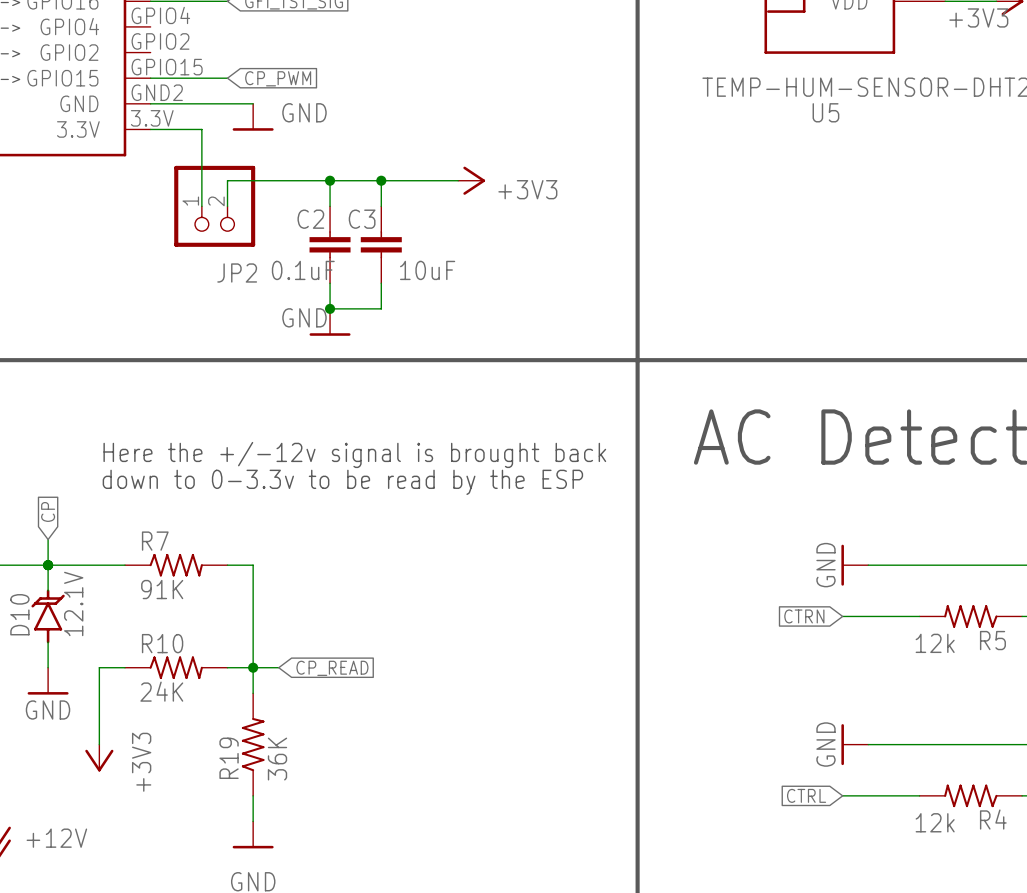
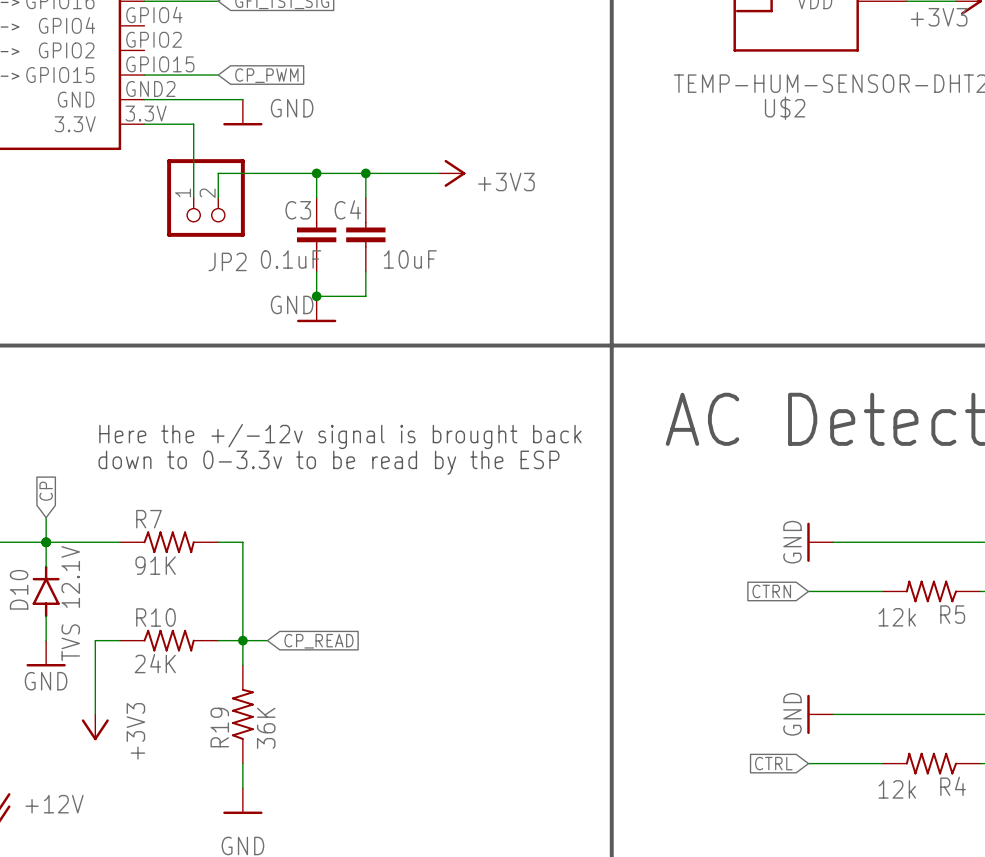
U5 name: U5 (825, 112) -> U$2 (785, 108)
C2 name: C2 (310, 219) -> C3 (298, 210)
C3 name: C3 (362, 219) -> C4 (347, 209)
D10 symbol: [31, 589, 65, 644] -> [32, 565, 60, 618]
D10 value: 12.1V (73, 603) -> TVS 12.1V (70, 603)

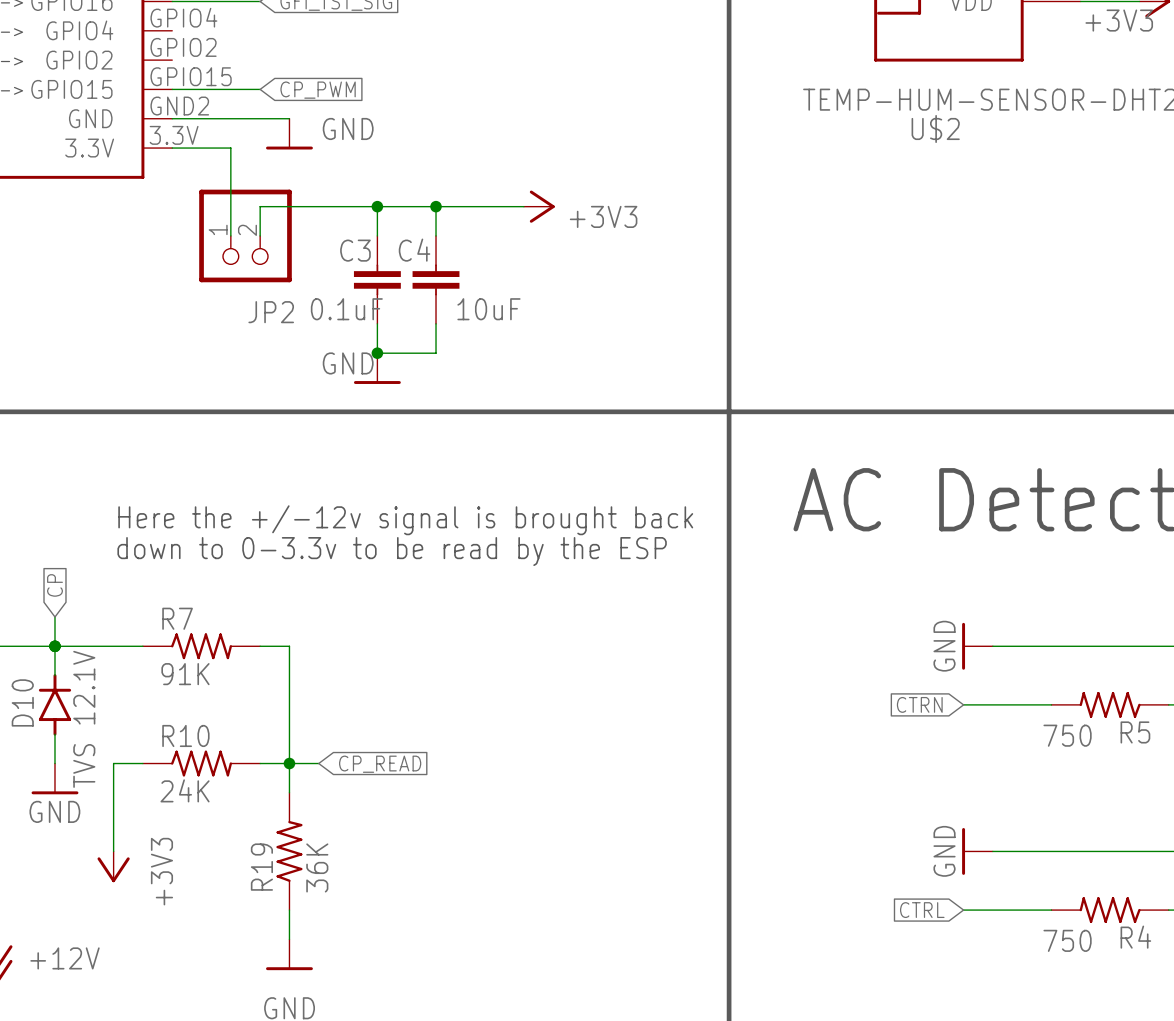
R5 value: 12k (897, 617) -> 750 (1067, 735)
R4 value: 12k (897, 789) -> 750 (1067, 940)

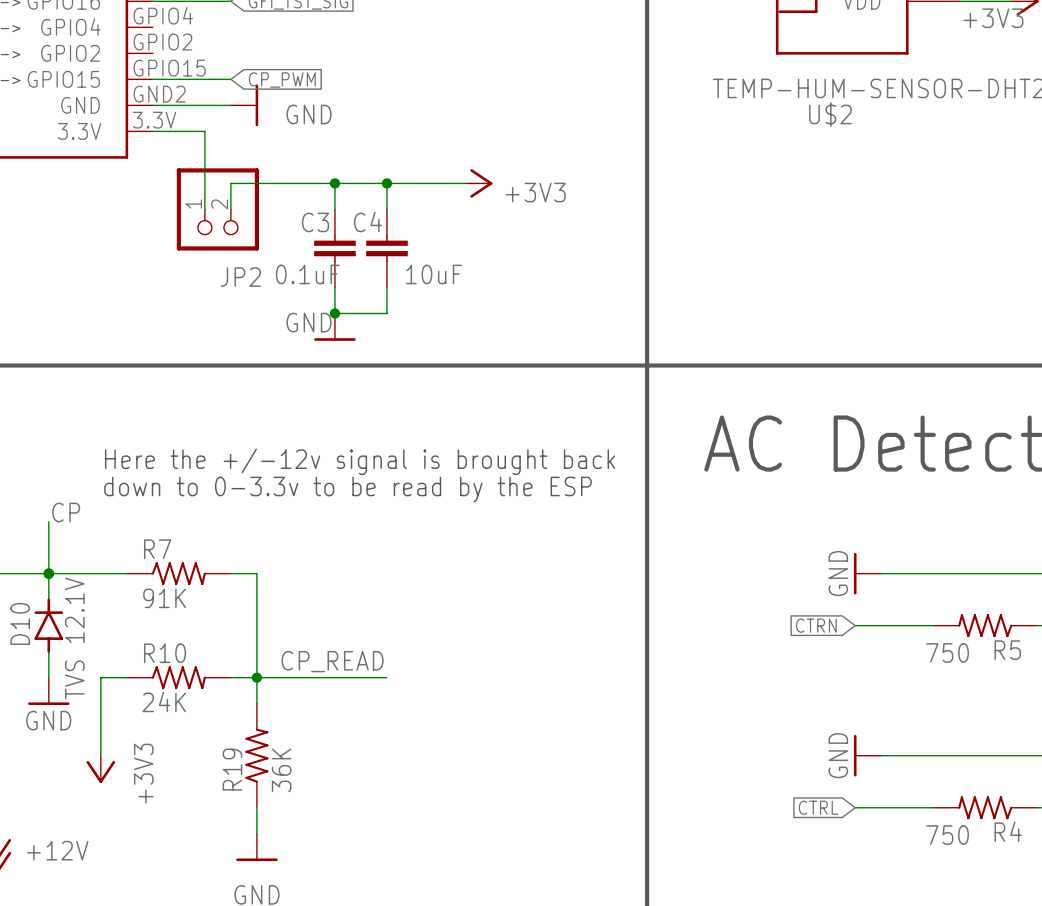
power symbol rotation: 0° (289, 148) -> 90° counterclockwise (256, 105)
label: none -> CP (66, 512)
global label: CP (54, 585) -> none
wire: none -> (48, 521) (48, 547)
label: none -> CP_READ (332, 661)
wire: none -> (282, 677) (386, 677)
global label: CP_READ (380, 764) -> none

